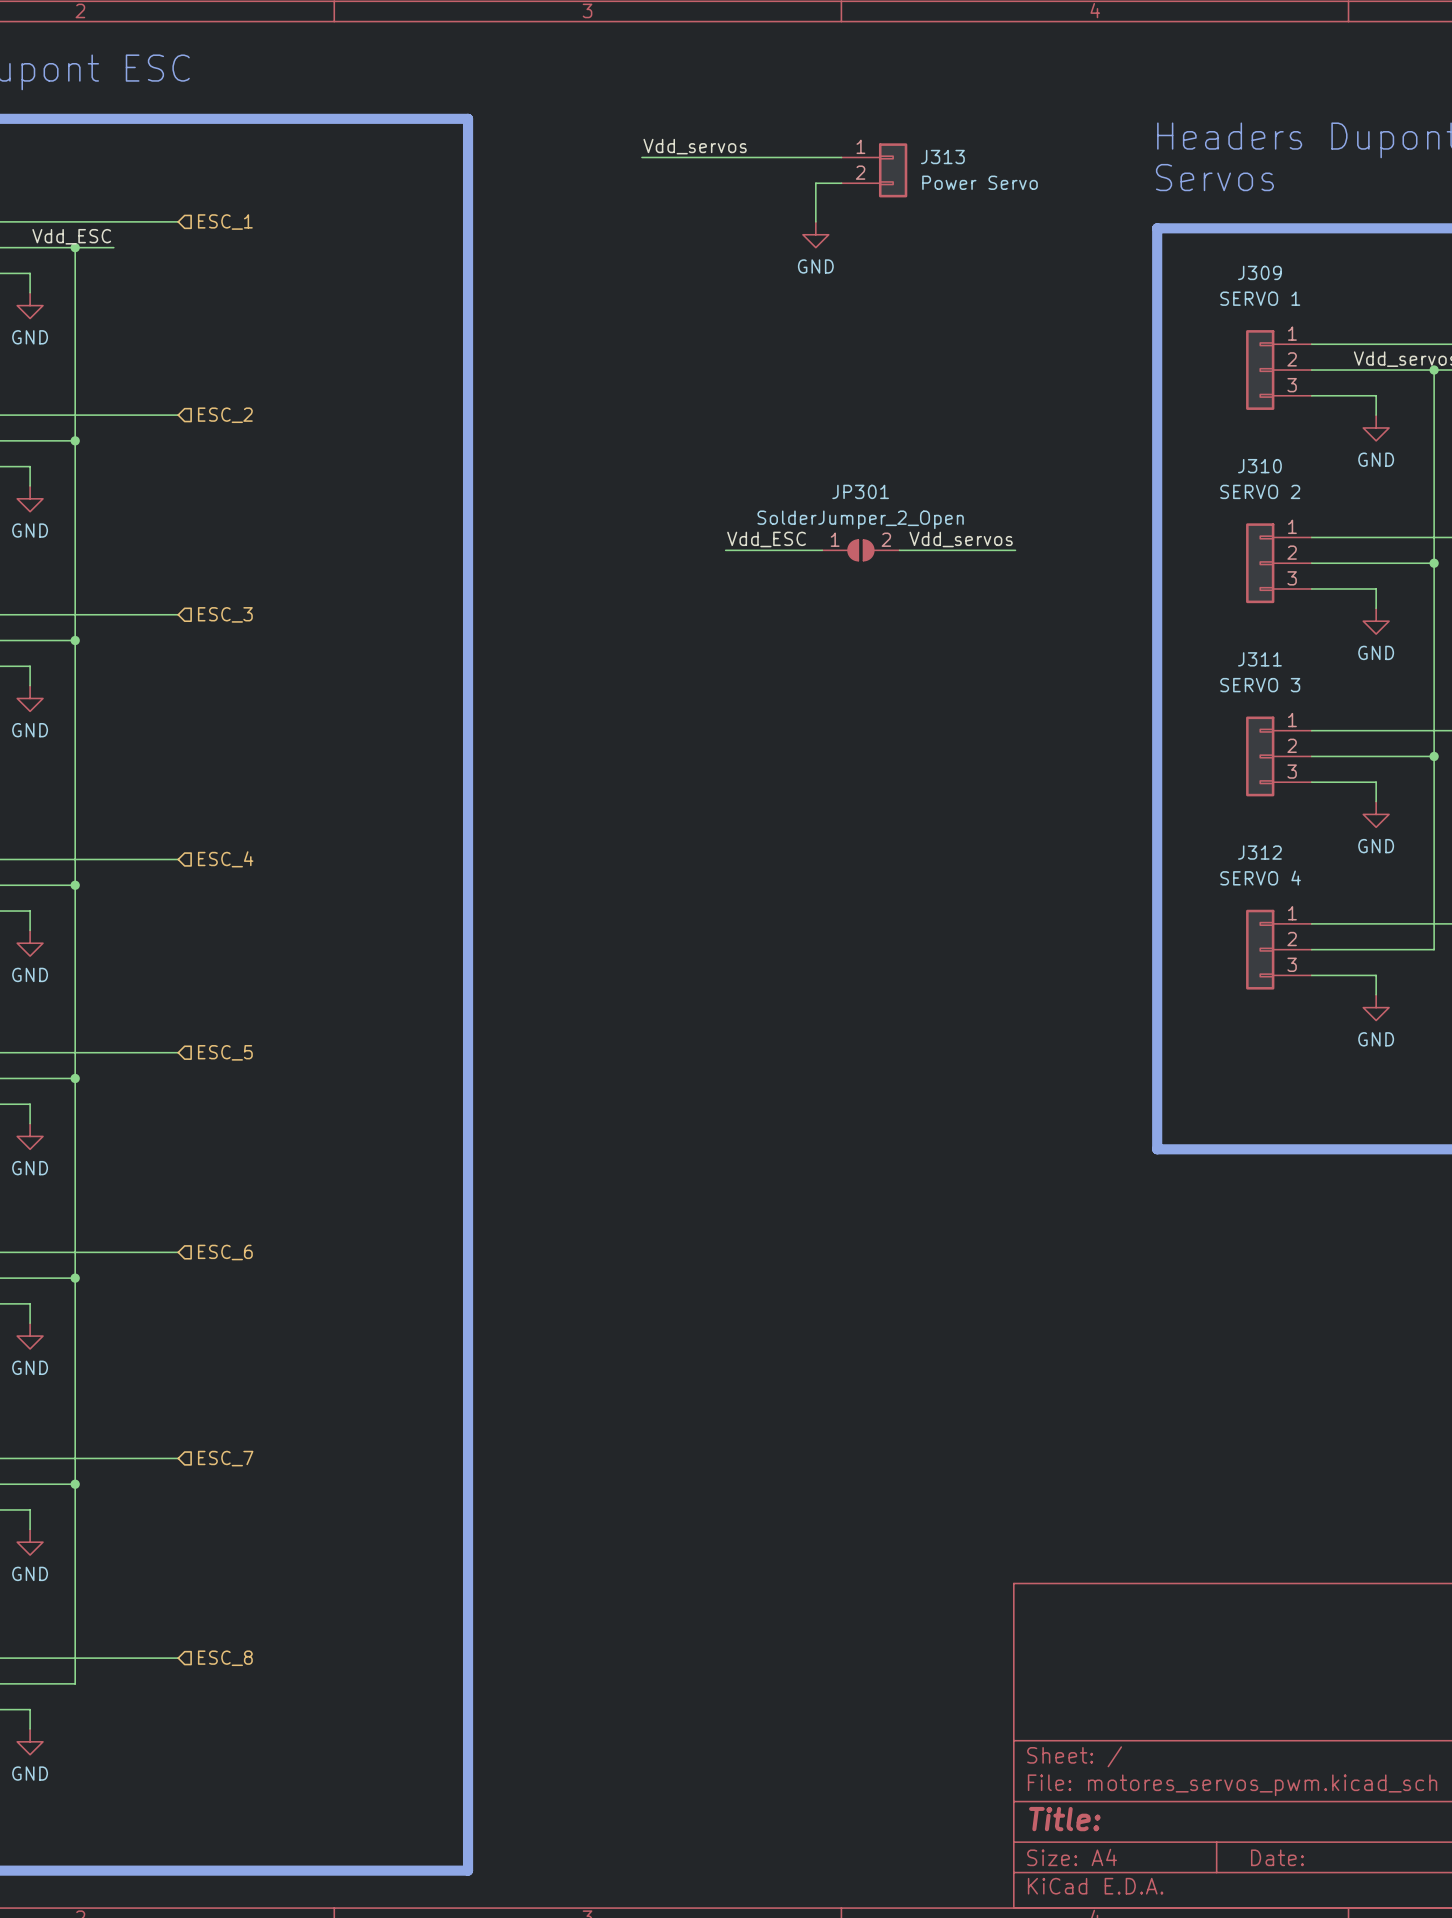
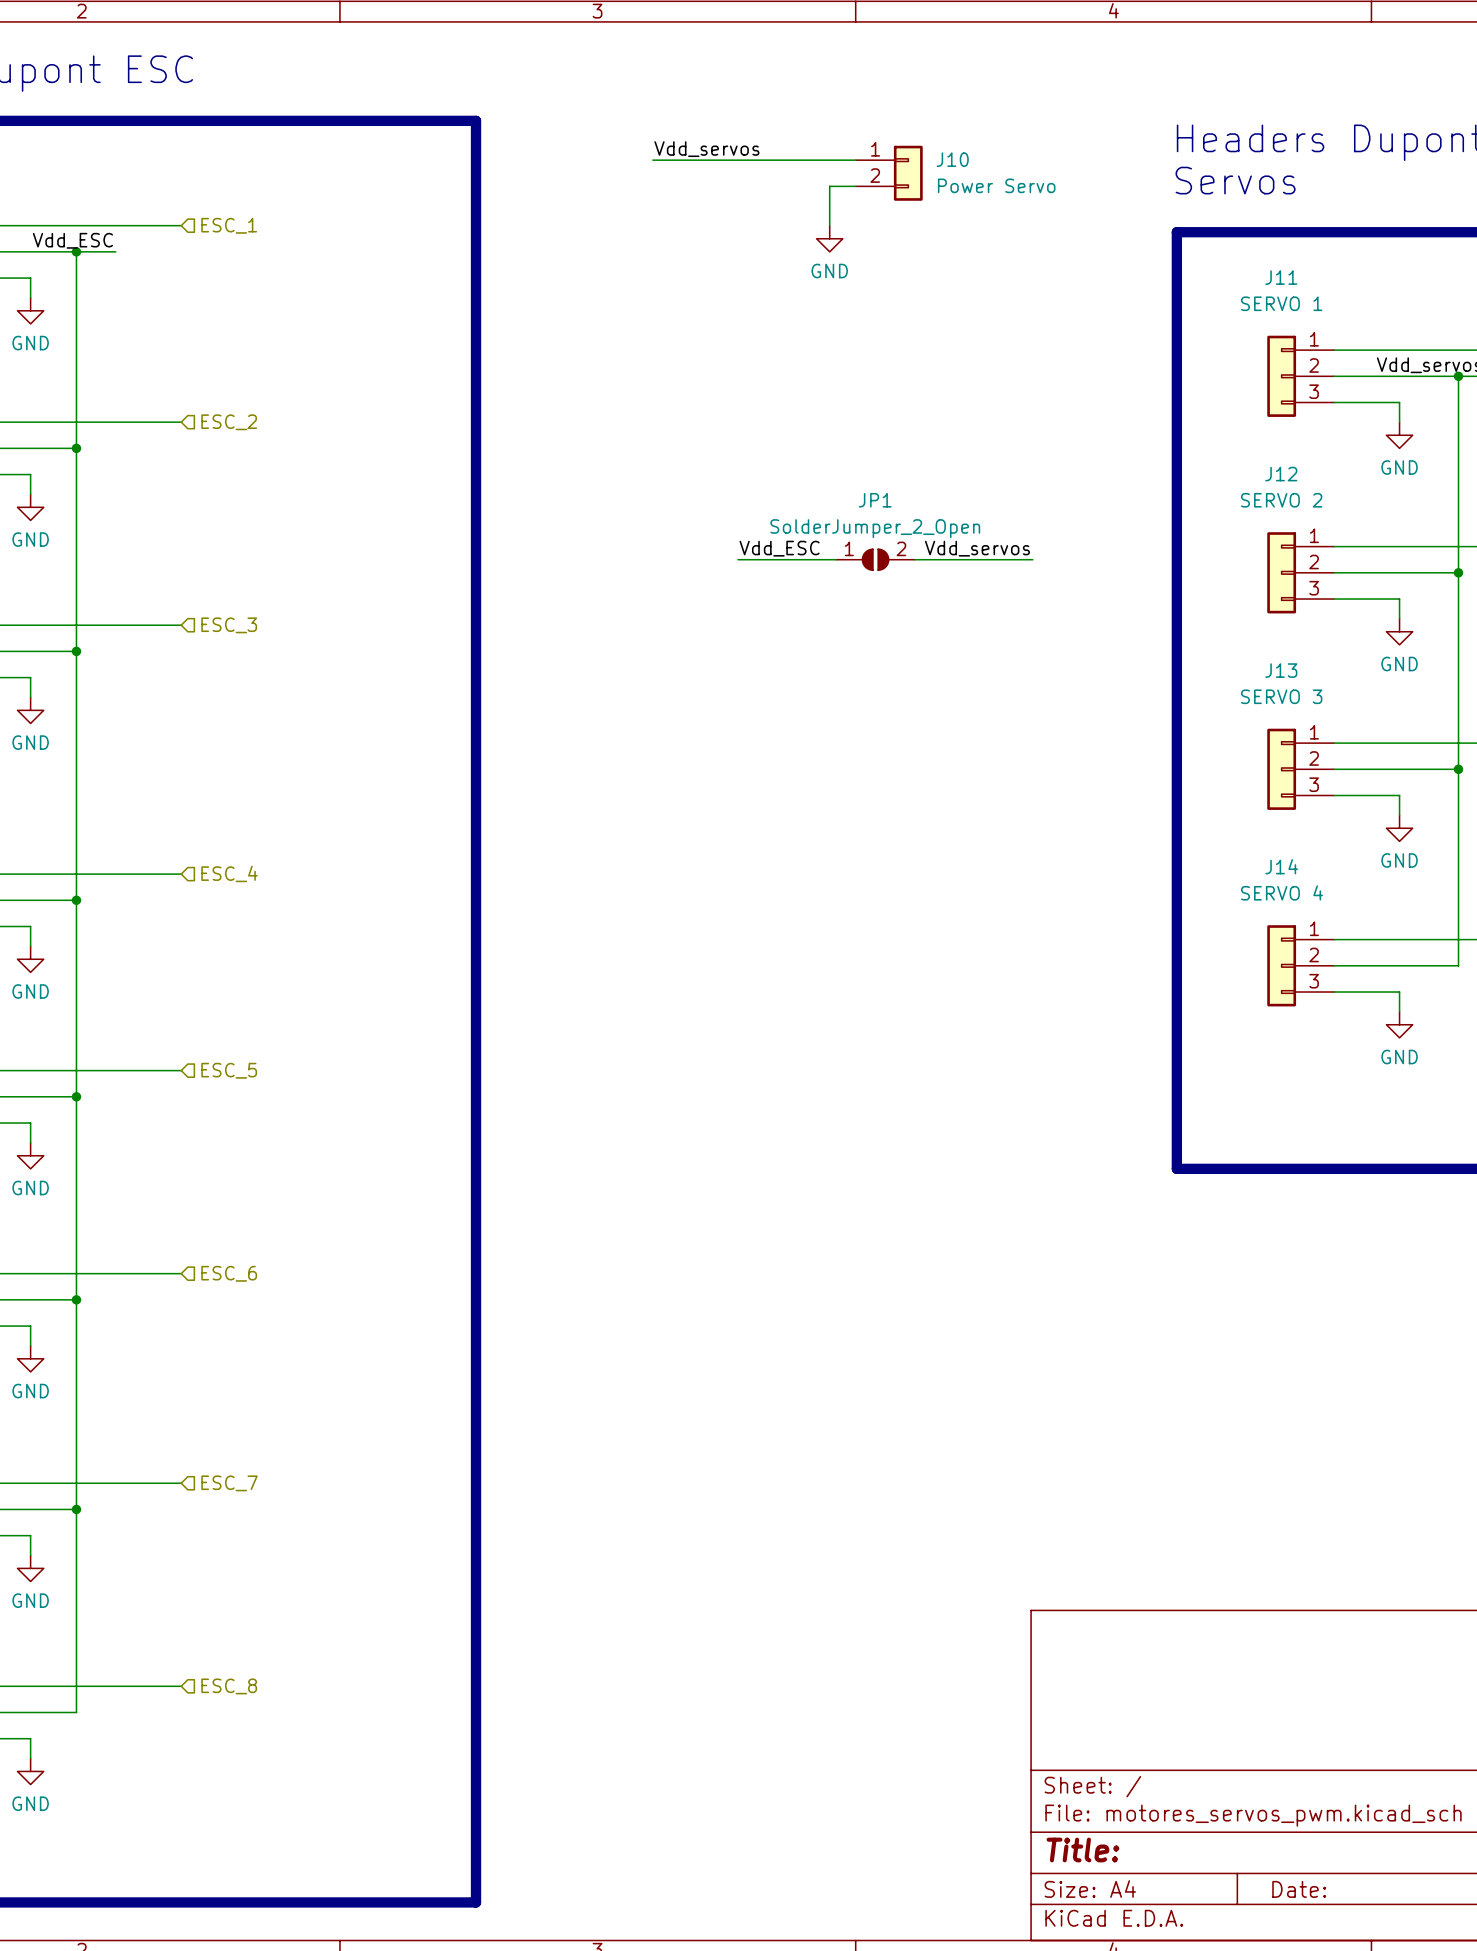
J313 name: J313 (942, 157) -> J10 (952, 159)
J309 name: J309 (1259, 272) -> J11 (1281, 277)
J310 name: J310 (1259, 466) -> J12 (1281, 474)
JP301 name: JP301 (860, 491) -> JP1 (875, 500)
J311 name: J311 (1259, 659) -> J13 (1281, 670)
J312 name: J312 (1259, 852) -> J14 (1281, 866)

